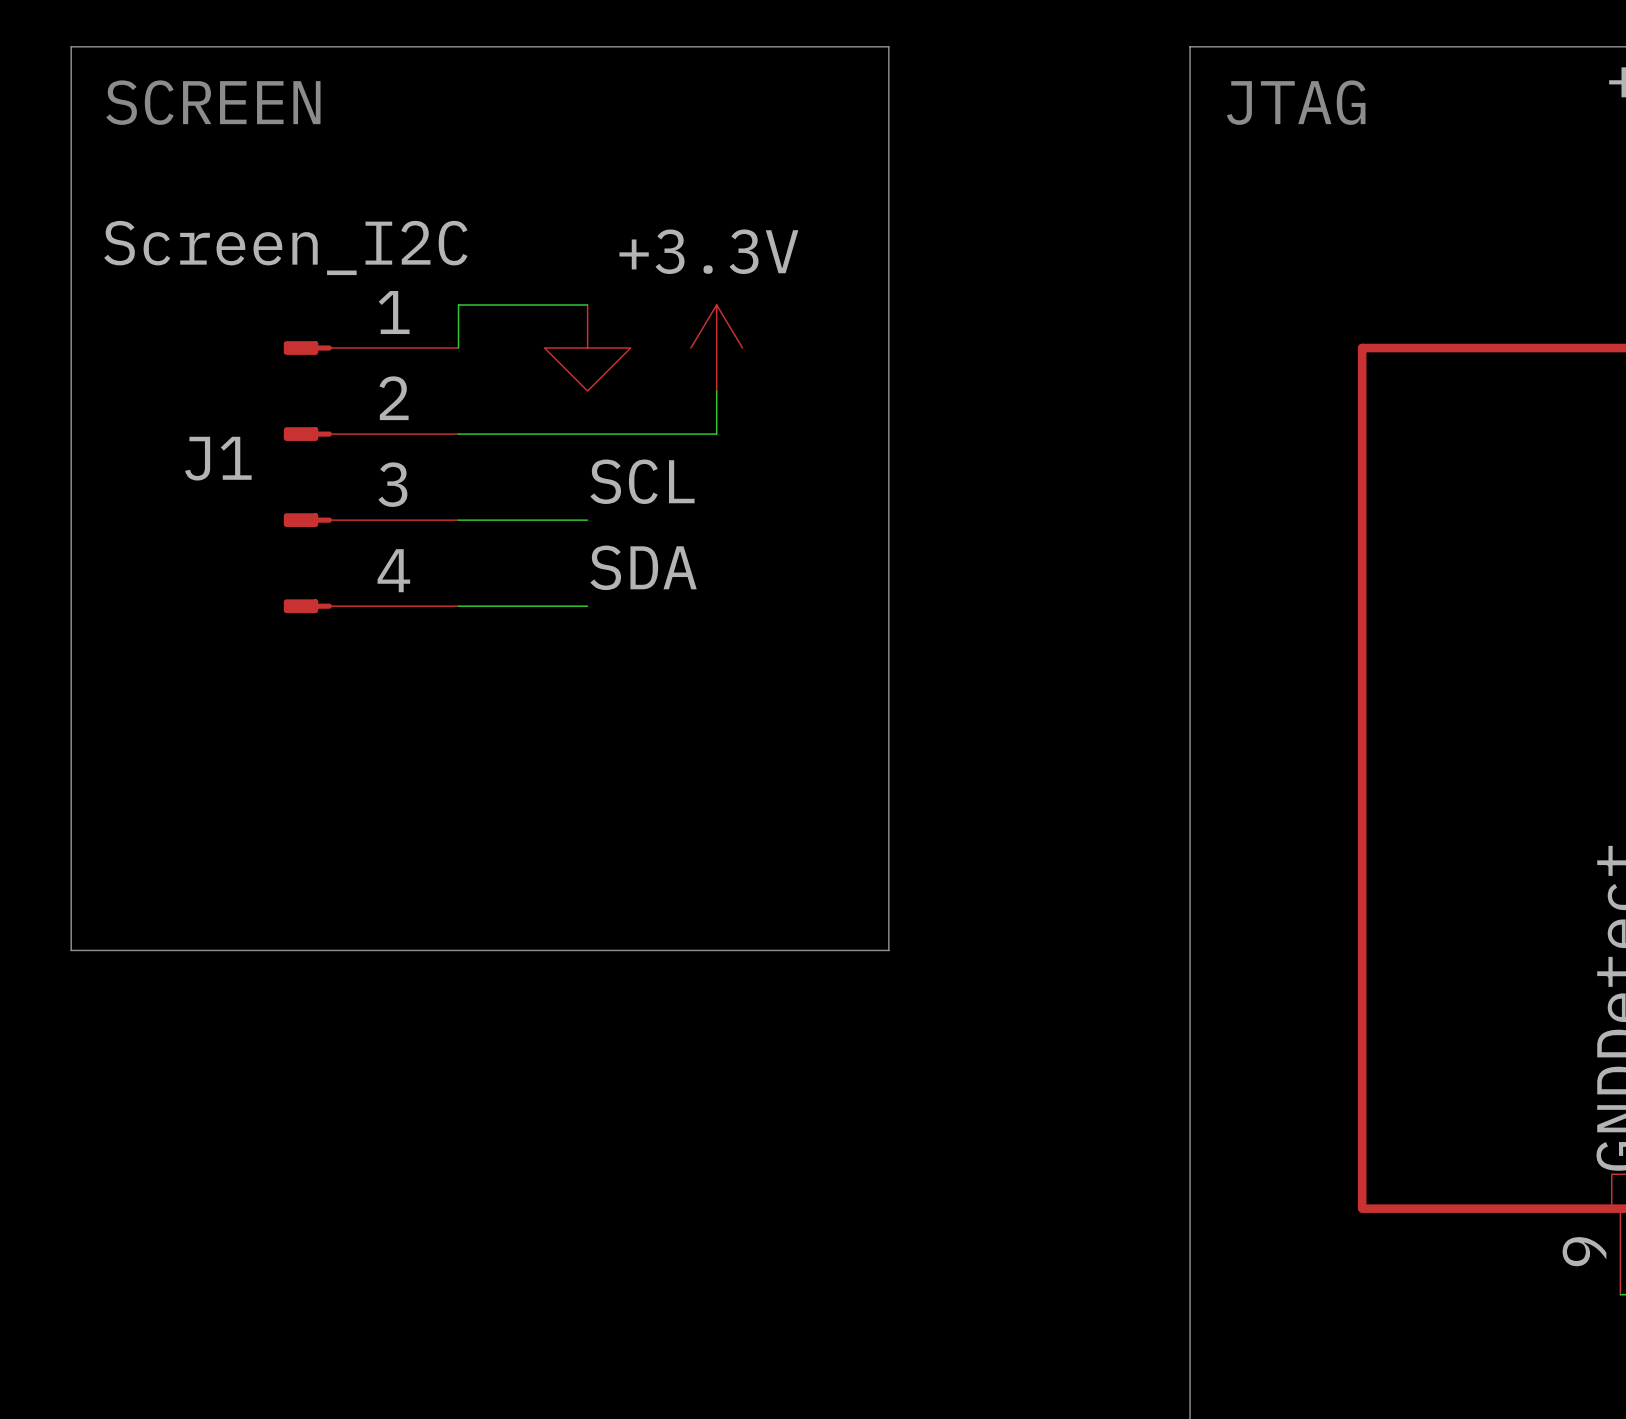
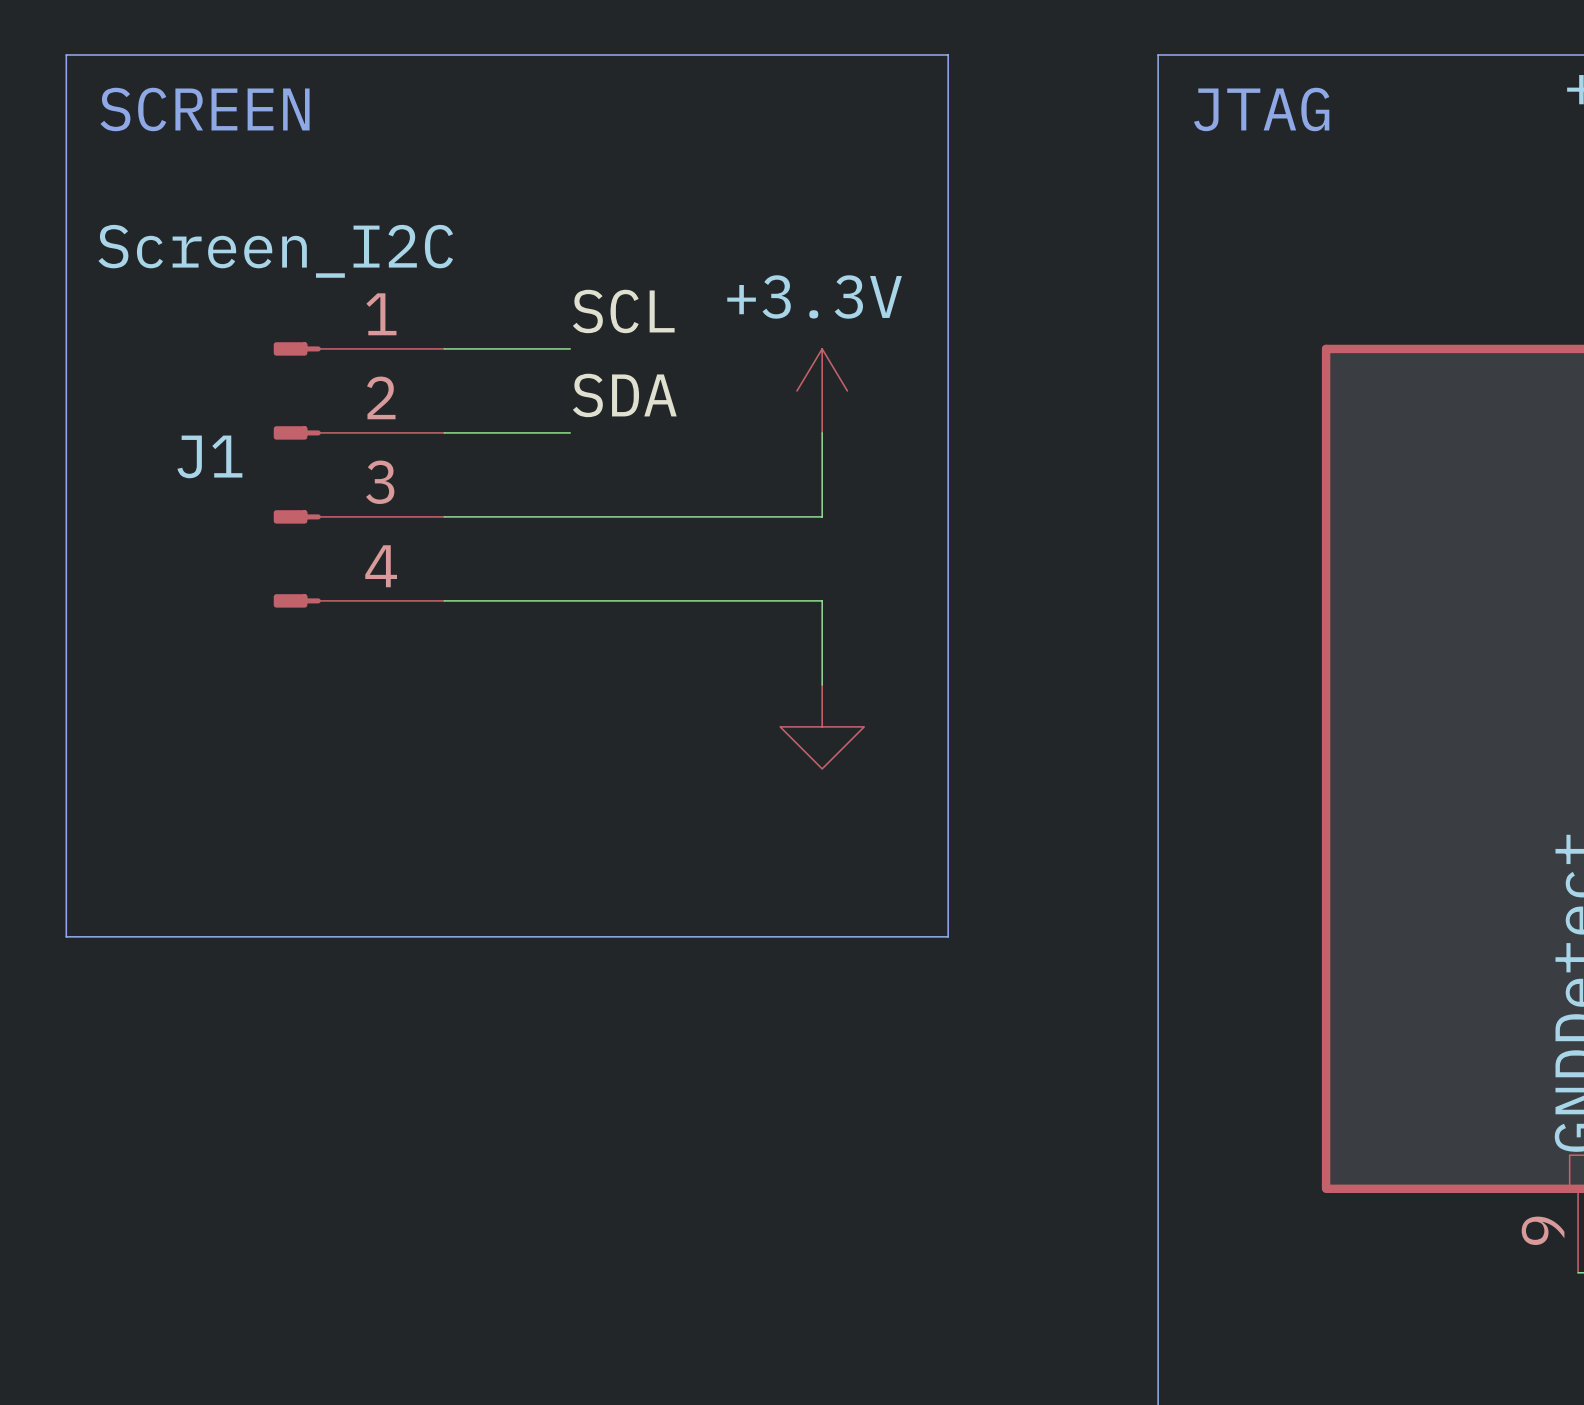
line: (888, 46) (888, 950) -> (864, 54) (948, 54) (948, 936) (864, 936)
wire: (587, 304) (458, 304) (458, 348) -> (570, 348) (444, 348)
power symbol position: (587, 348) -> (822, 726)
power symbol position: +3.3V (716, 348) -> +3.3V (822, 390)
wire: (716, 391) (716, 434) (587, 434) -> none
wire: none -> (822, 432) (822, 516) (570, 516)
label position: SCL (642, 481) -> SCL (623, 311)
label position: SDA (643, 567) -> SDA (624, 395)
wire: none -> (570, 600) (822, 600) (822, 684)

